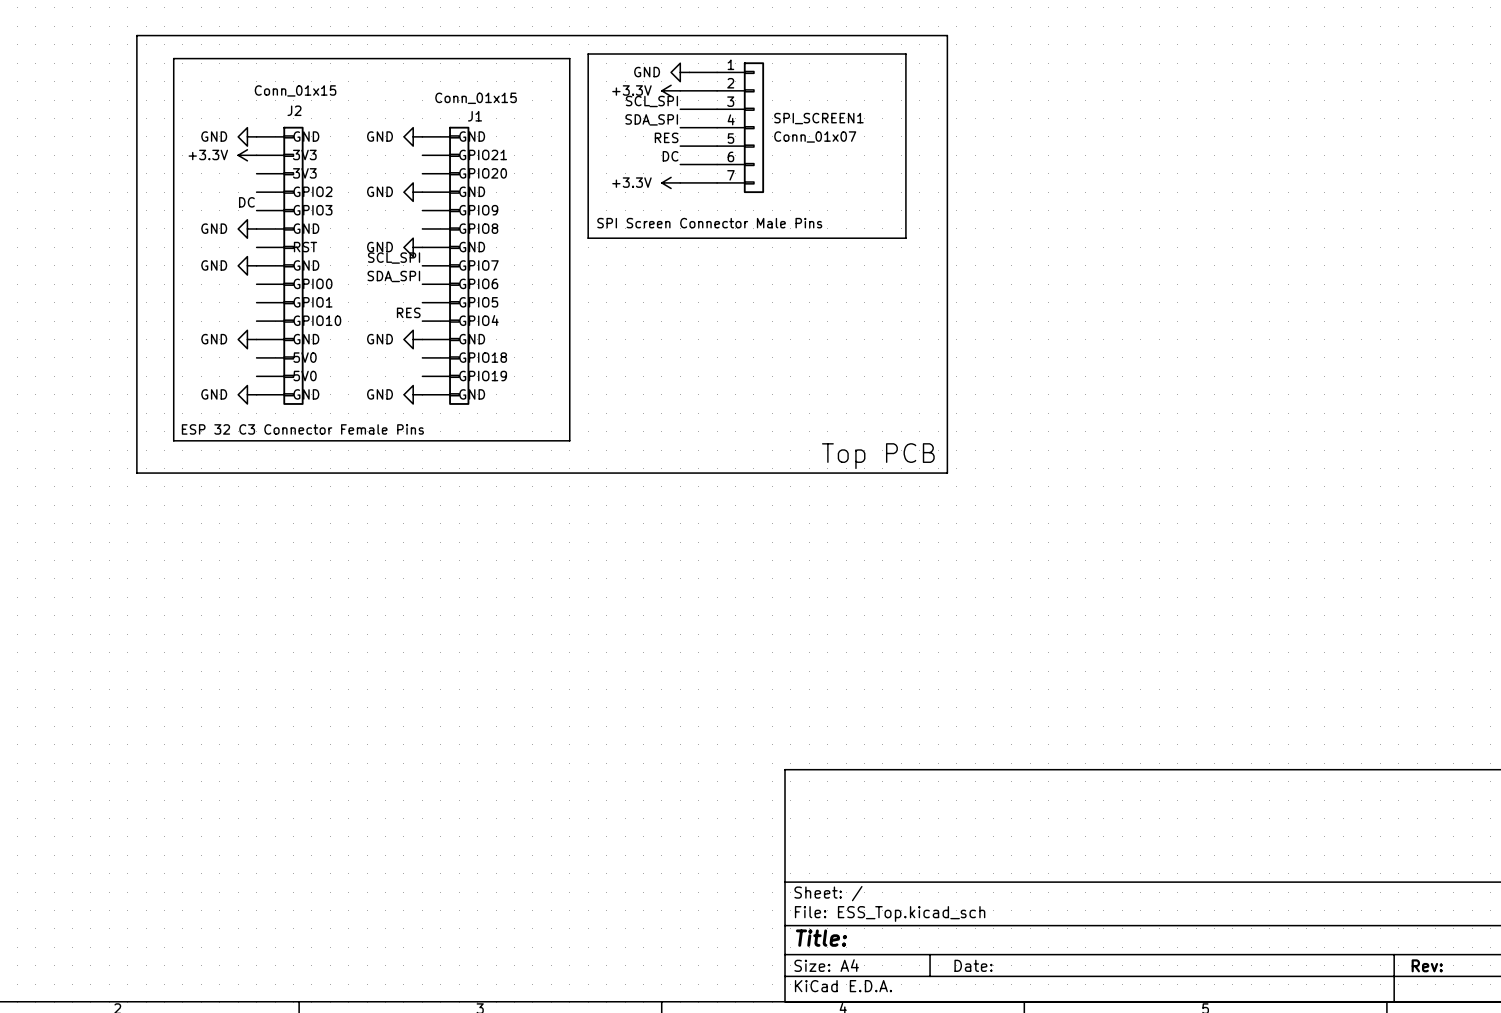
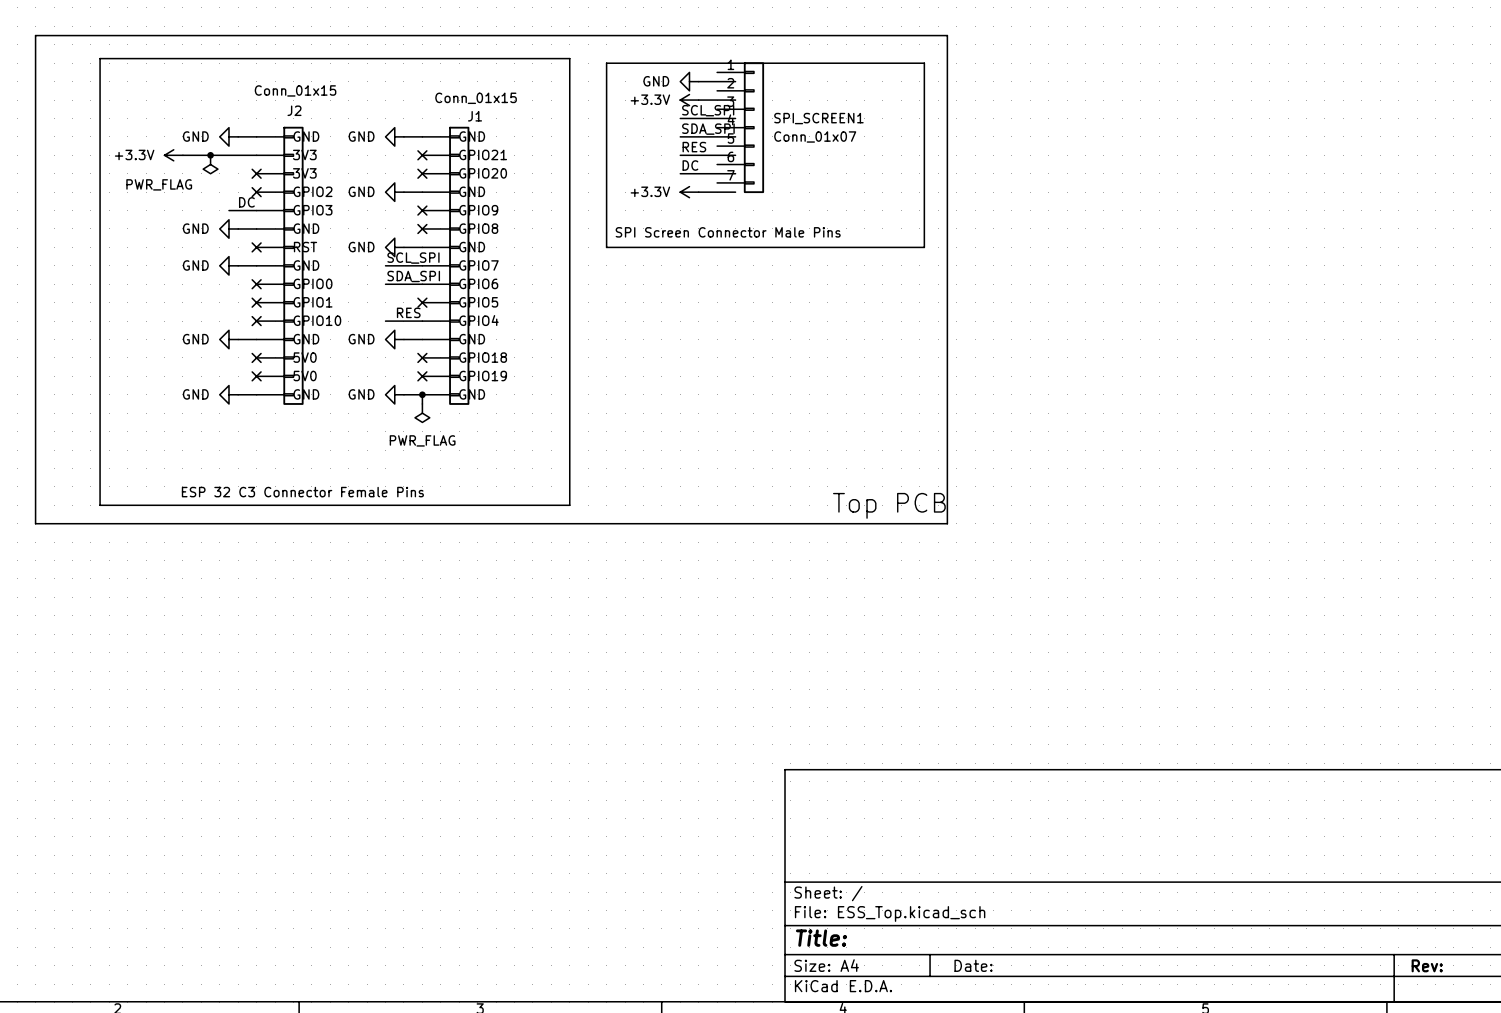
line: (136, 35) (136, 473) (947, 473) -> (136, 35) (35, 35) (35, 523) (947, 523) (947, 473)
line: (588, 54) (905, 54) (905, 238) (588, 238) (588, 54) -> (606, 63) (924, 63) (924, 247) (606, 247) (606, 63)
line: (173, 58) (173, 440) (569, 440) -> (173, 58) (100, 58) (100, 505) (569, 505) (569, 440)
power symbol position: GND (680, 72) -> GND (689, 81)
wire: (689, 72) (717, 72) -> none
power symbol position: +3.3V (671, 90) -> +3.3V (689, 100)
wire: (680, 90) (717, 90) -> (698, 81) (735, 81)
label position: SCL_SPI (651, 101) -> SCL_SPI (708, 110)
wire: (680, 109) (717, 109) -> (698, 100) (735, 100)
wire: none -> (680, 118) (735, 118)
label position: SDA_SPI (651, 119) -> SDA_SPI (708, 129)
wire: (680, 127) (717, 127) -> none
power symbol position: GND (247, 136) -> GND (228, 136)
power symbol position: GND (413, 136) -> GND (394, 136)
wire: none -> (680, 136) (735, 136)
label position: RES (666, 137) -> RES (694, 147)
wire: (680, 146) (717, 146) -> none
wire: none -> (182, 155) (256, 155)
junction: none -> (210, 155)
power symbol position: +3.3V (247, 155) -> +3.3V (173, 155)
no-connect mark: none -> (422, 155)
wire: none -> (680, 155) (735, 155)
label position: DC (670, 156) -> DC (690, 165)
power symbol: none -> PWR_FLAG (210, 164)
wire: (680, 164) (717, 164) -> none
no-connect mark: none -> (256, 173)
no-connect mark: none -> (422, 173)
wire: none -> (680, 173) (735, 173)
power symbol position: +3.3V (671, 182) -> +3.3V (689, 192)
wire: (680, 182) (717, 182) -> (698, 192) (735, 192)
no-connect mark: none -> (256, 192)
power symbol position: GND (413, 192) -> GND (394, 192)
wire: none -> (228, 210) (256, 210)
no-connect mark: none -> (422, 210)
text position: SPI Screen Connector Male Pins (709, 223) -> SPI Screen Connector Male Pins (728, 232)
power symbol position: GND (247, 228) -> GND (228, 228)
no-connect mark: none -> (422, 228)
no-connect mark: none -> (256, 247)
power symbol position: GND (413, 247) -> GND (394, 247)
label position: SCL_SPI (394, 258) -> SCL_SPI (413, 258)
power symbol position: GND (247, 265) -> GND (228, 265)
wire: none -> (385, 265) (422, 265)
label position: SDA_SPI (393, 276) -> SDA_SPI (413, 276)
no-connect mark: none -> (256, 284)
wire: none -> (385, 284) (422, 284)
no-connect mark: none -> (256, 302)
no-connect mark: none -> (422, 302)
no-connect mark: none -> (256, 321)
wire: none -> (385, 321) (422, 321)
power symbol position: GND (247, 339) -> GND (228, 339)
power symbol position: GND (413, 339) -> GND (394, 339)
no-connect mark: none -> (256, 357)
no-connect mark: none -> (422, 357)
no-connect mark: none -> (256, 376)
no-connect mark: none -> (422, 376)
power symbol position: GND (247, 394) -> GND (228, 394)
power symbol position: GND (413, 394) -> GND (394, 394)
junction: none -> (422, 394)
power symbol: none -> PWR_FLAG (422, 413)
text position: ESP 32 C3 Connector Female Pins (302, 429) -> ESP 32 C3 Connector Female Pins (302, 492)
text position: Top PCB (878, 456) -> Top PCB (889, 505)

